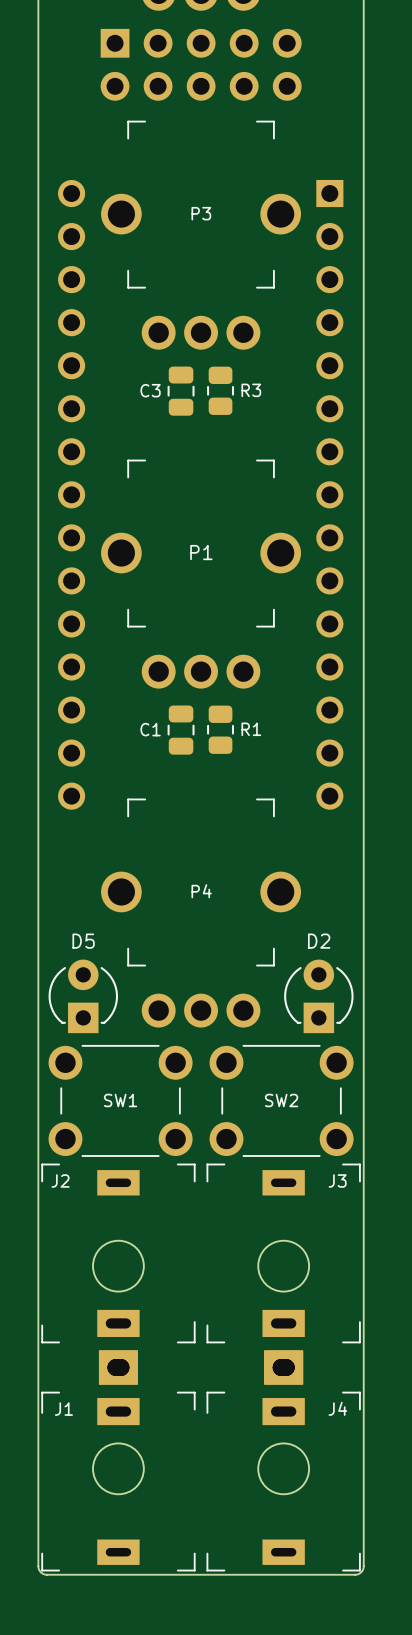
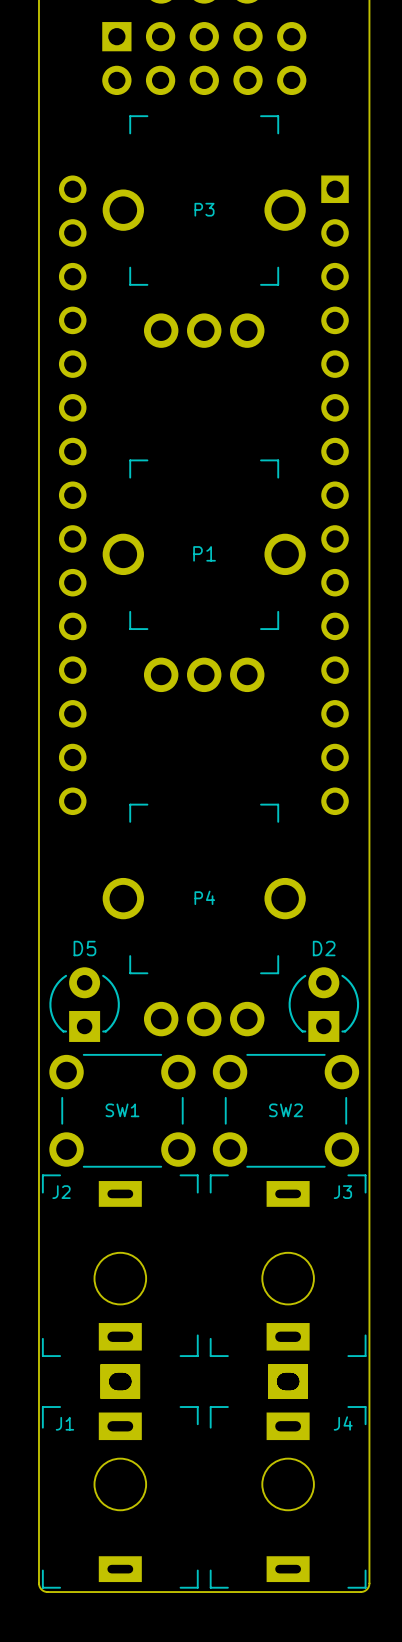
R3: (220, 390) -> none
C3: (181, 391) -> none
R1: (220, 729) -> none
C1: (181, 730) -> none

